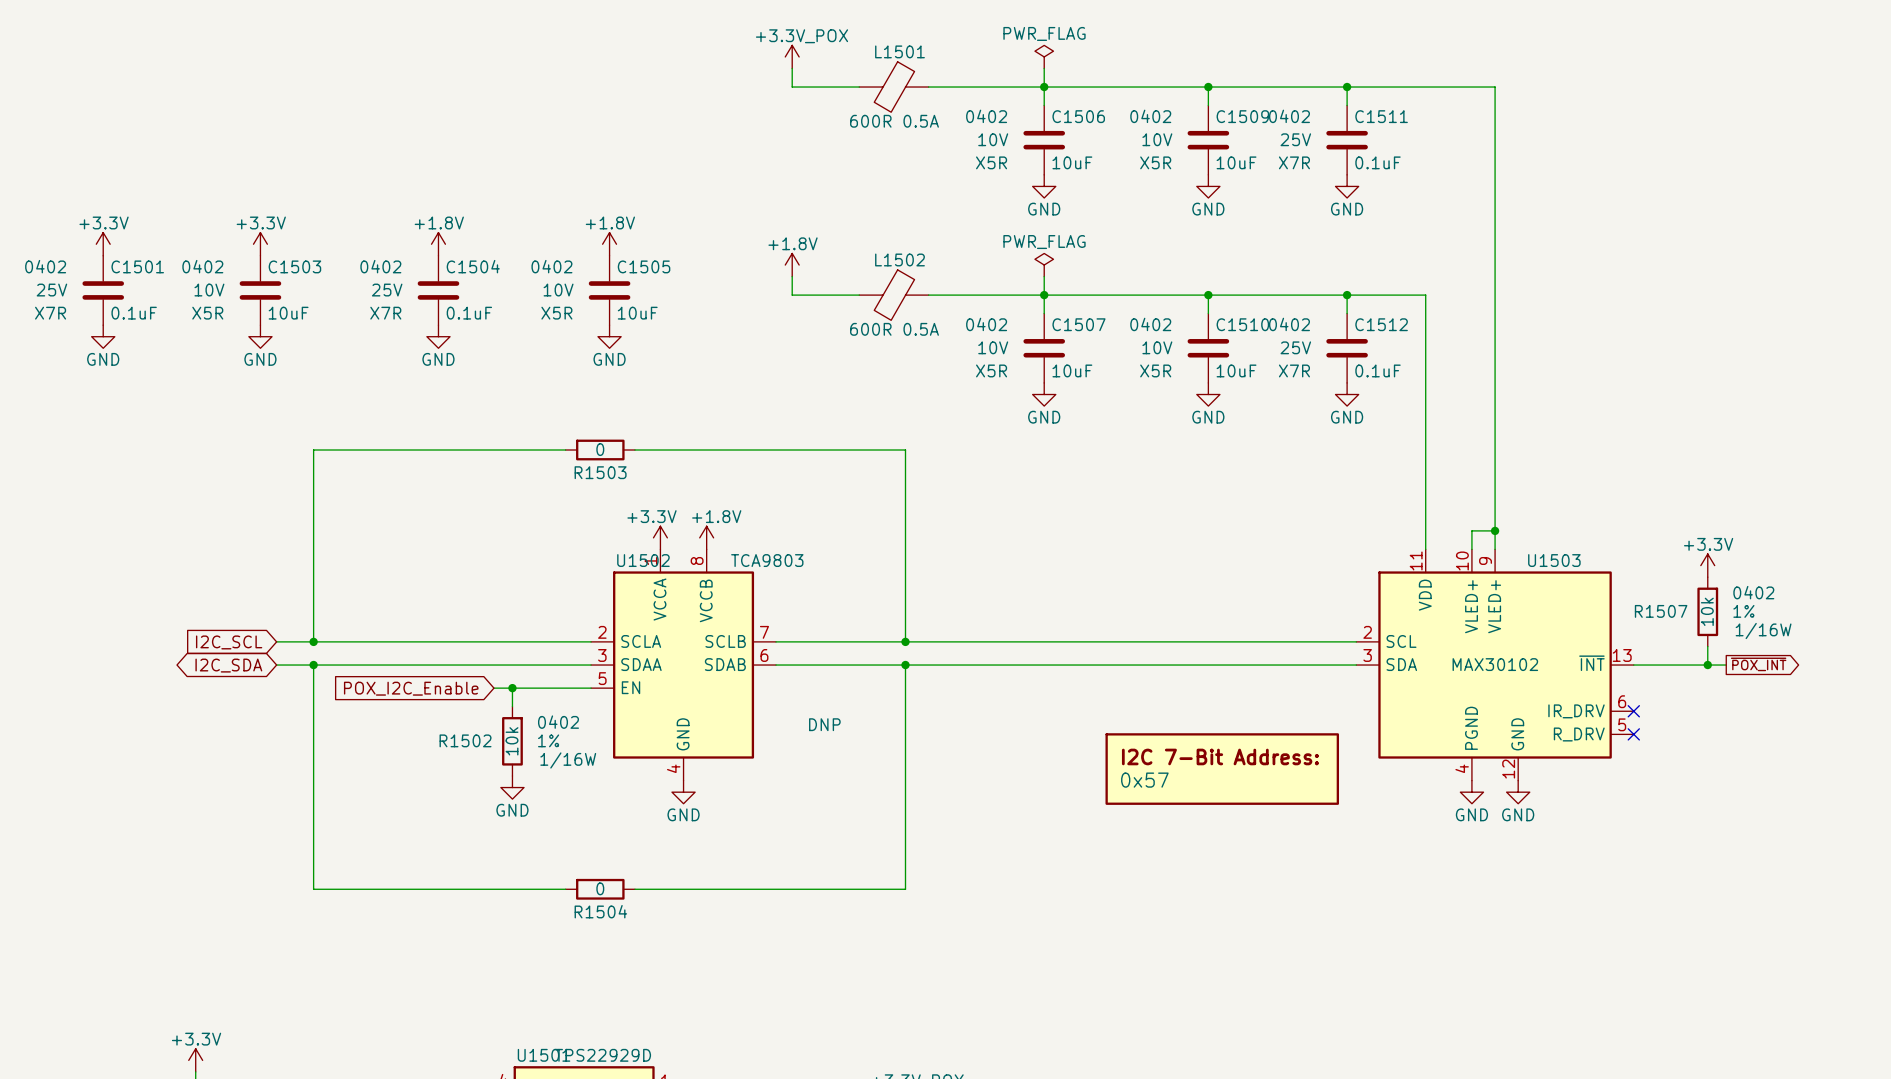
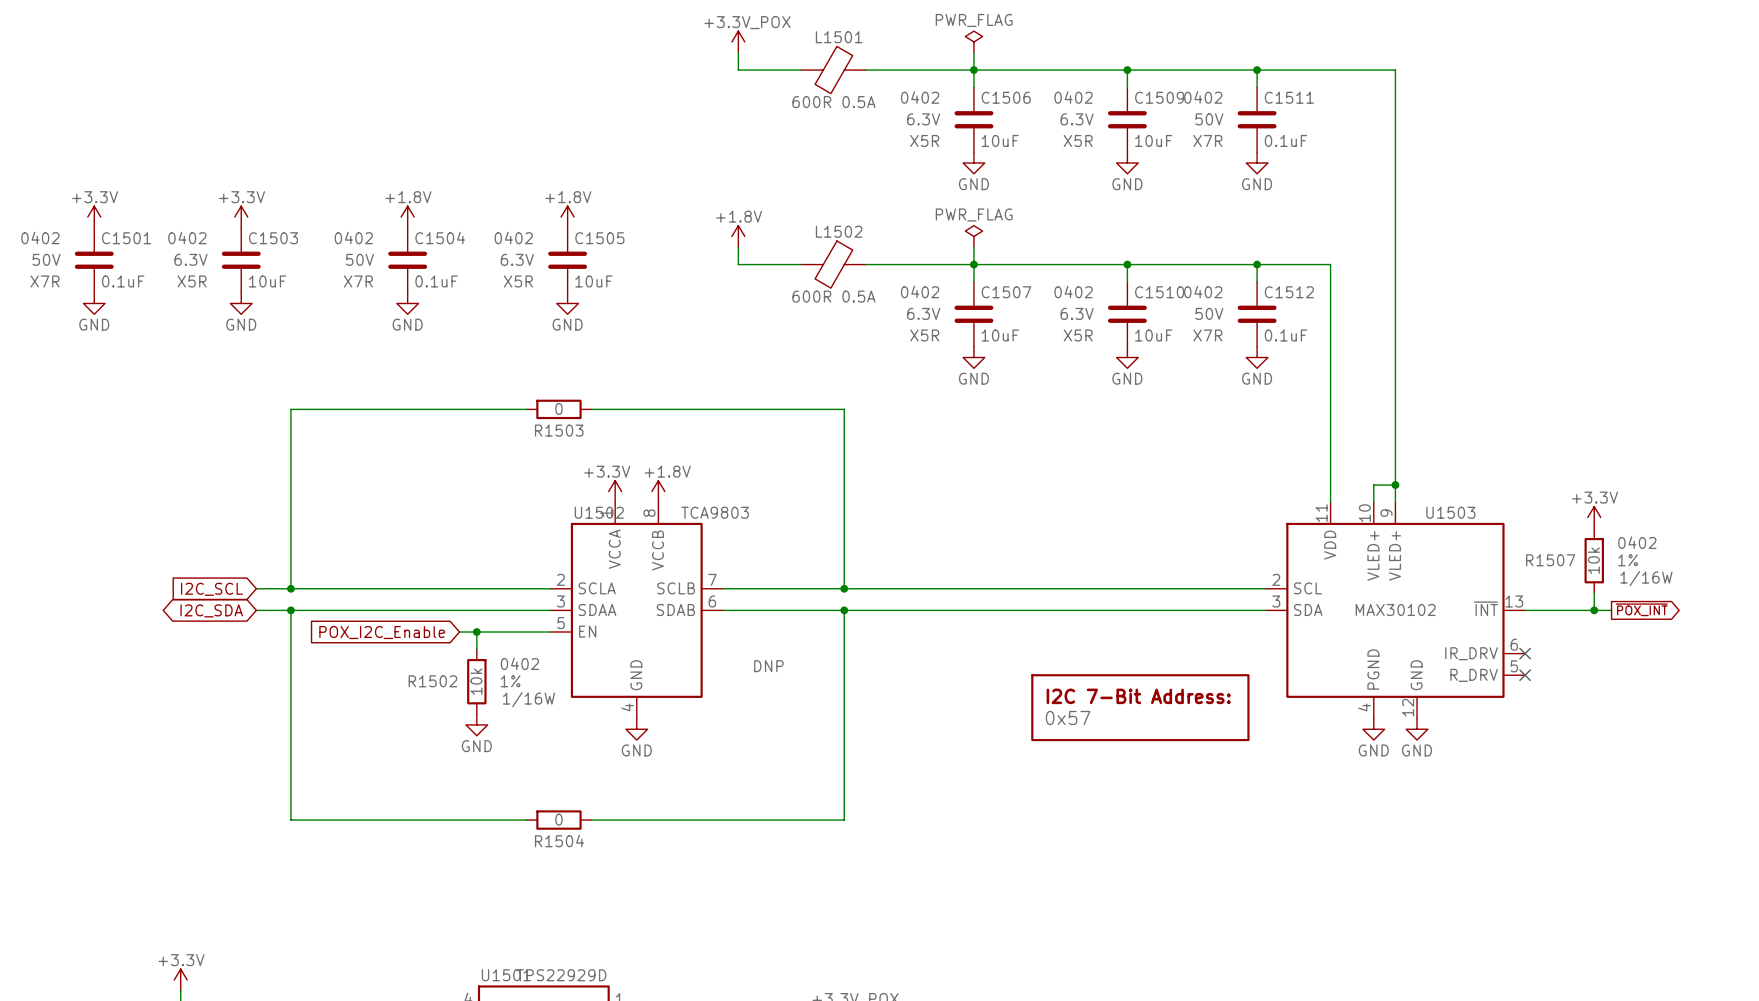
C1506 text: 10V (993, 139) -> 6.3V (923, 119)
C1509 text: 10V (1157, 139) -> 6.3V (1077, 119)
C1511 text: 25V (1295, 139) -> 50V (1209, 119)
C1501 text: 25V (51, 290) -> 50V (46, 259)
C1503 text: 10V (209, 290) -> 6.3V (190, 259)
C1504 text: 25V (387, 290) -> 50V (359, 259)
C1505 text: 10V (558, 290) -> 6.3V (517, 259)
C1507 text: 10V (993, 347) -> 6.3V (923, 313)
C1510 text: 10V (1157, 347) -> 6.3V (1077, 313)
C1512 text: 25V (1295, 347) -> 50V (1209, 313)

